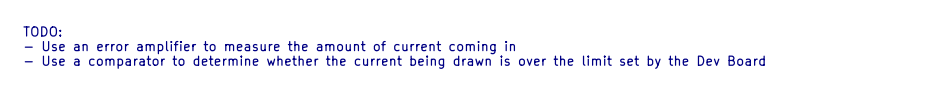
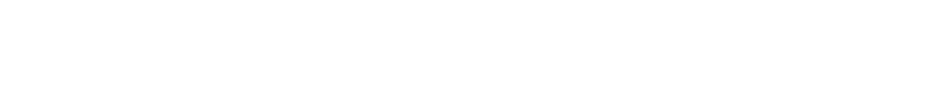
text: TODO: (42, 31) -> none
text: - Use an error amplifier to measure the amount of current coming in (269, 47) -> none
text: - Use a comparator to determine whether the current being drawn is over the limit set by the Dev Board (394, 62) -> none

